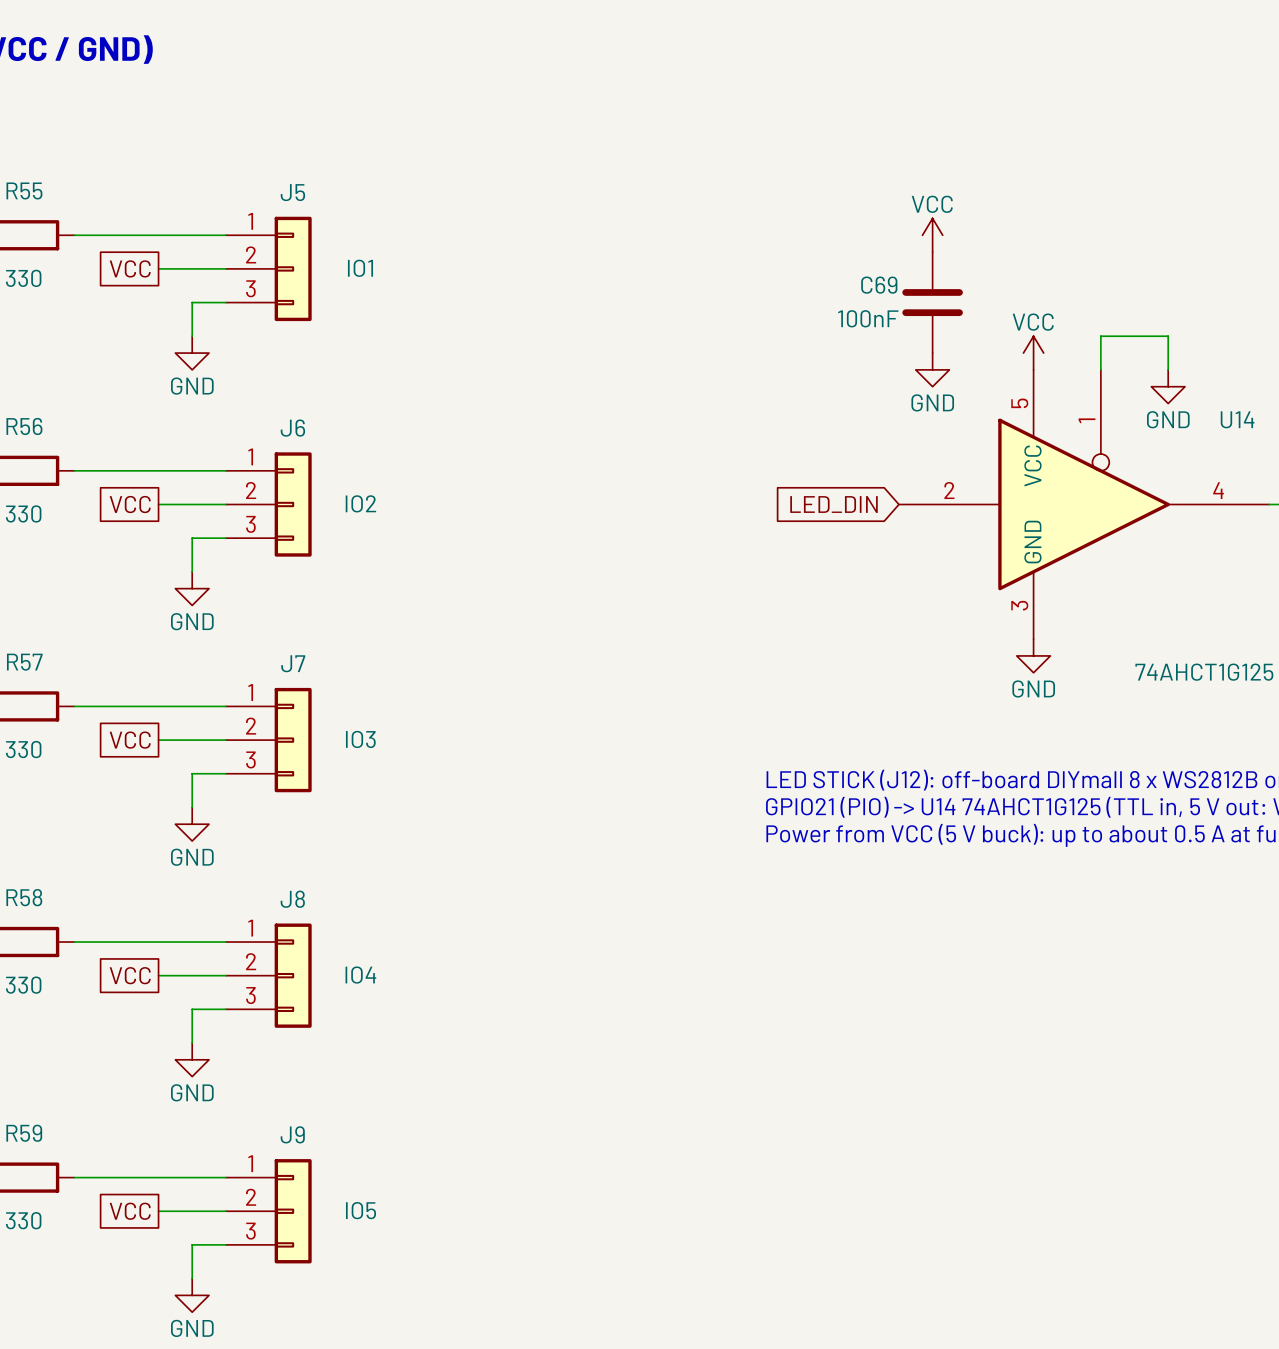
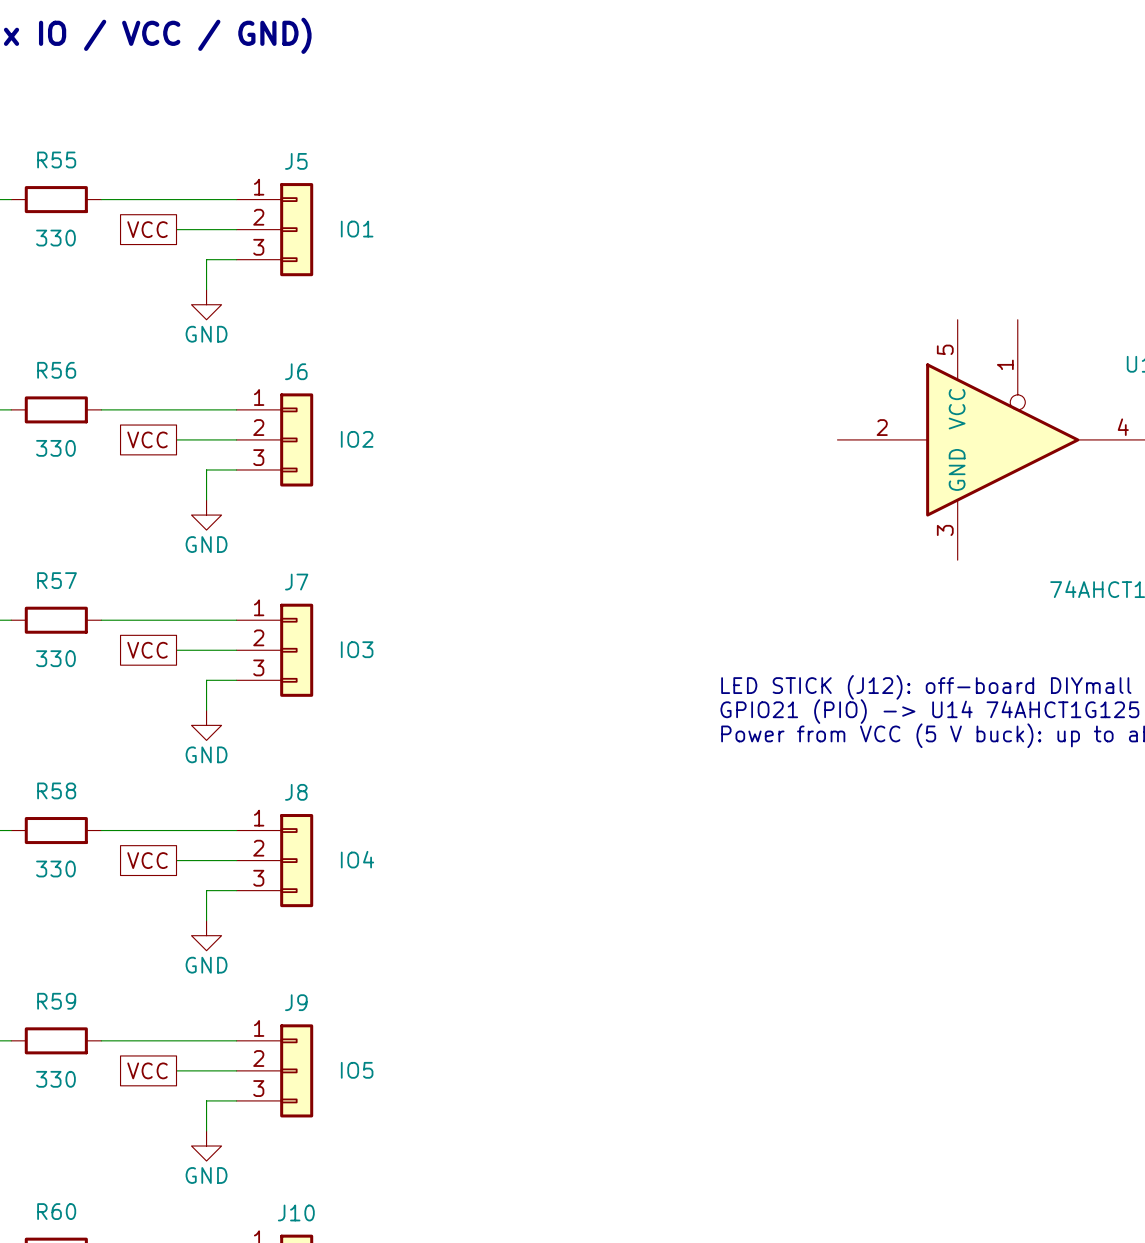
power symbol: VCC (932, 235) -> none
C69: 100nF (932, 302) -> none
power symbol: VCC (1033, 353) -> none
power symbol: GND (932, 369) -> none
wire: (1100, 369) (1100, 336) (1168, 336) (1168, 369) -> none
power symbol: GND (1168, 386) -> none
global label: LED_DIN (834, 504) -> none
power symbol: GND (1033, 655) -> none

